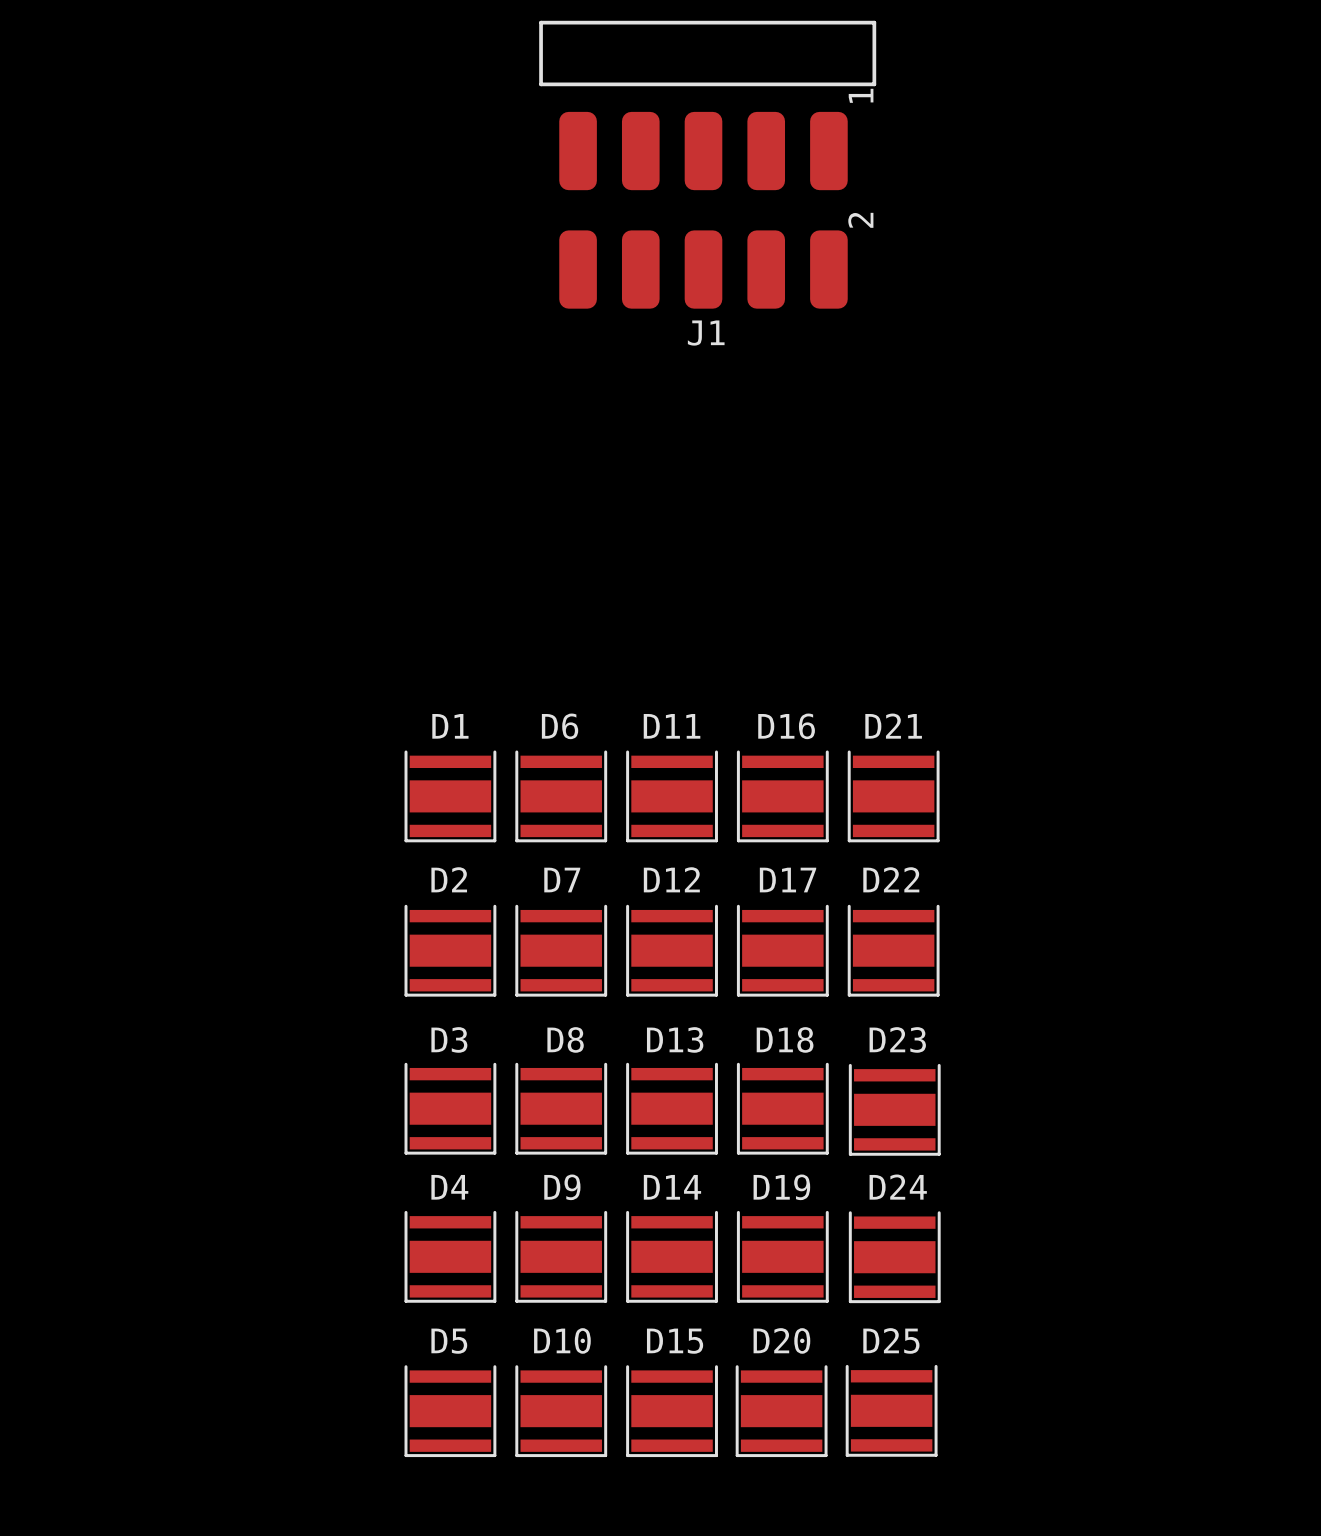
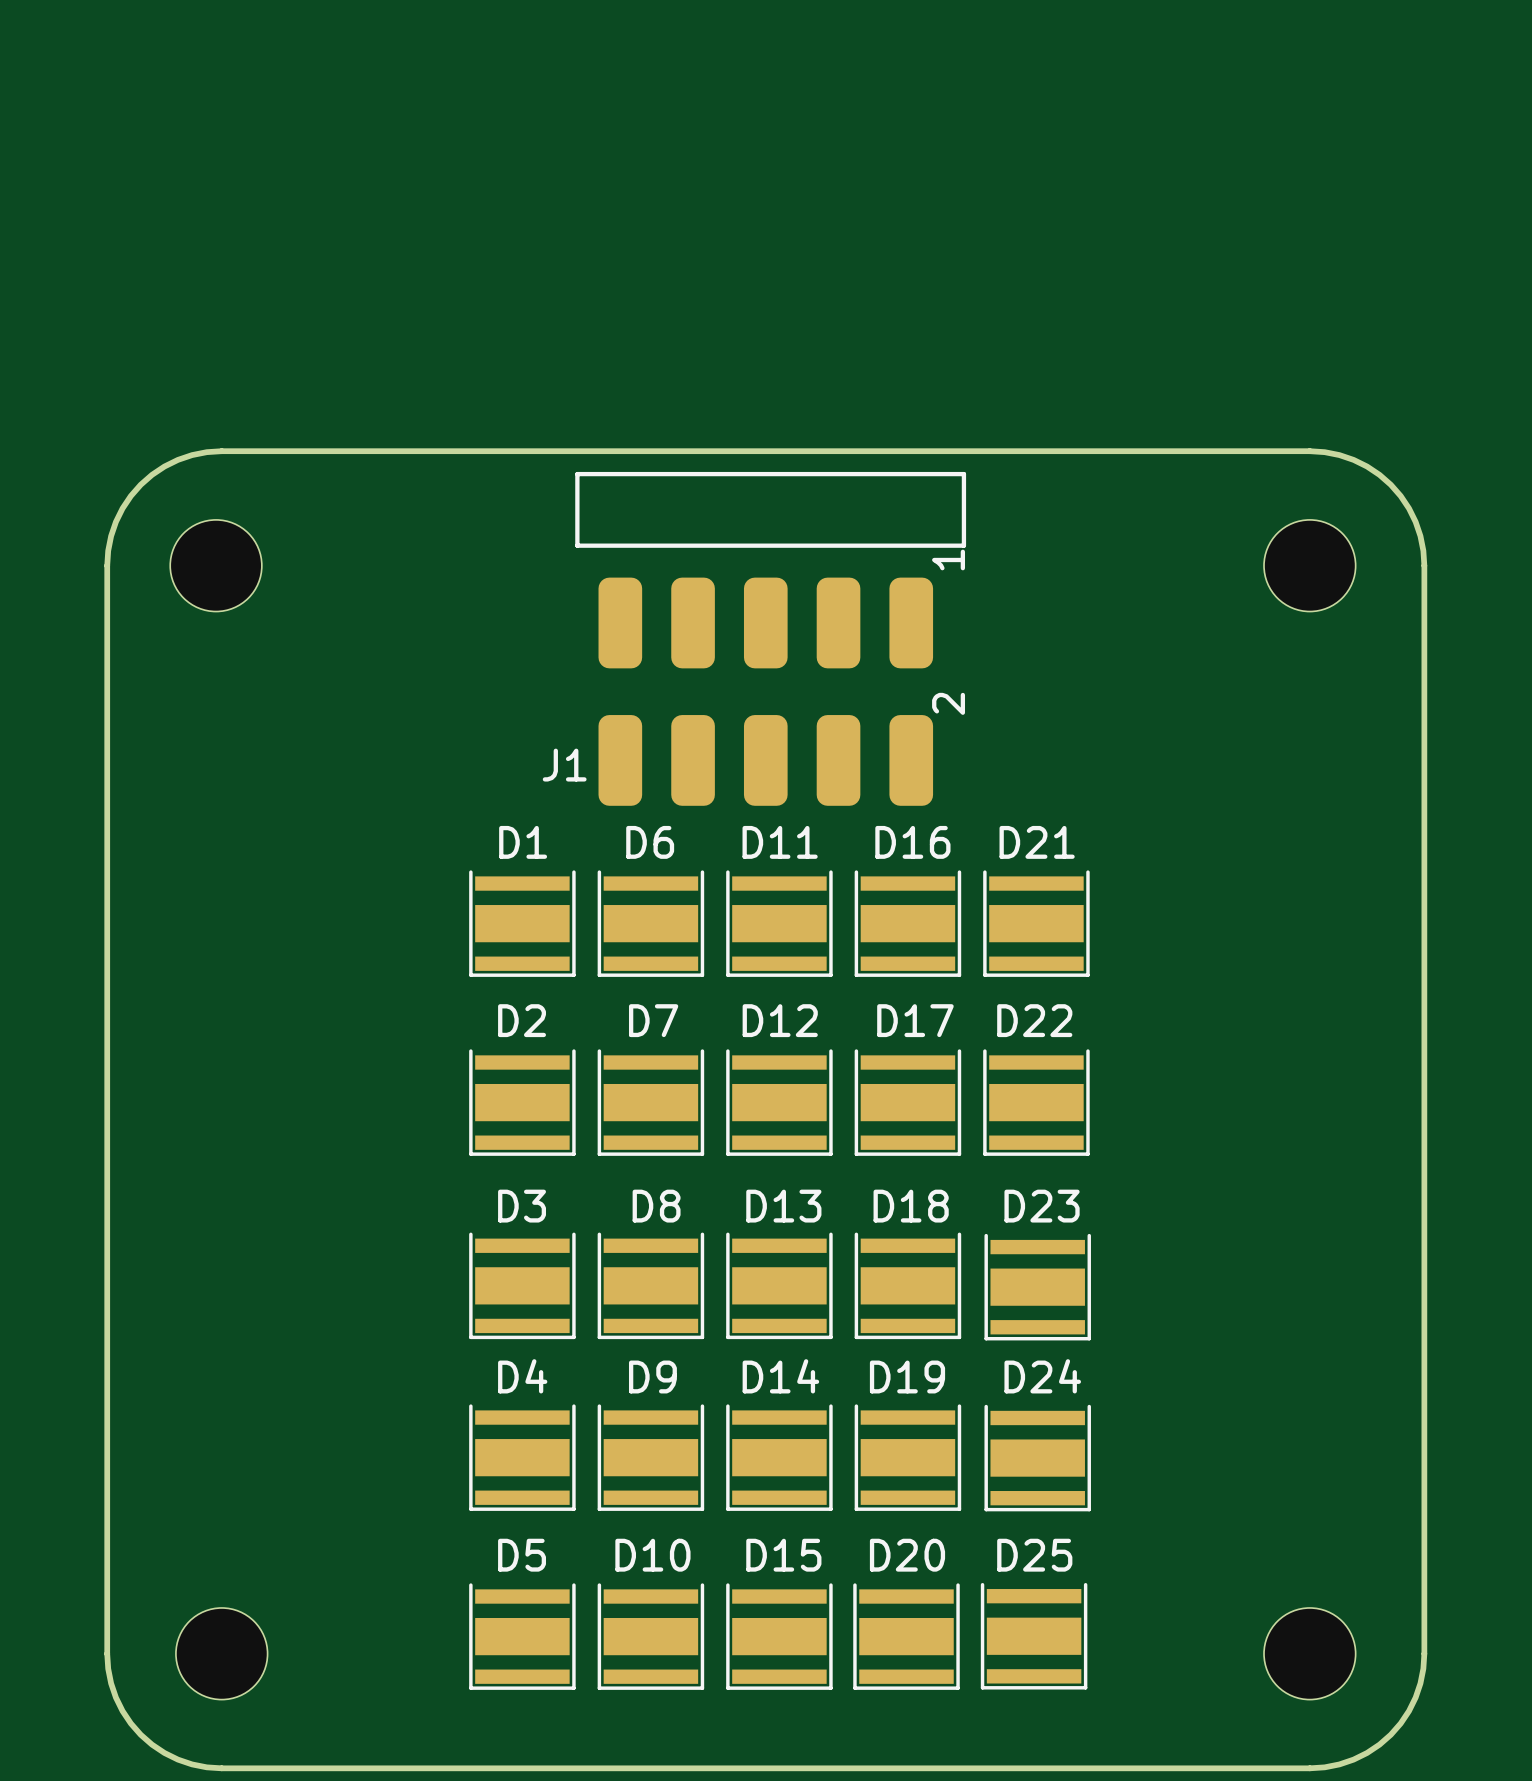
J1 position: (707, 164) -> (770, 638)
J1 name position: J1 (706, 333) -> J1 (564, 765)
board edge: none -> (221, 451) (1309, 451) (1324, 452) (1353, 459) (1367, 466) (1390, 484) (1409, 508) (1415, 521) (1423, 550) (1424, 565) (1424, 1653) (1423, 1668) (1415, 1697) (1409, 1711) (1390, 1734) (1367, 1752) (1353, 1759) (1324, 1767) (1309, 1768) (221, 1768) (206, 1767) (177, 1759) (164, 1752) (140, 1734) (122, 1711) (115, 1697) (108, 1668) (107, 1653) (107, 565) (108, 550) (115, 521) (122, 508) (140, 484) (164, 466) (177, 459) (206, 452) (221, 451)
part: none -> (216, 565)
part: none -> (1309, 565)
part: none -> (221, 1653)
part: none -> (1309, 1653)

